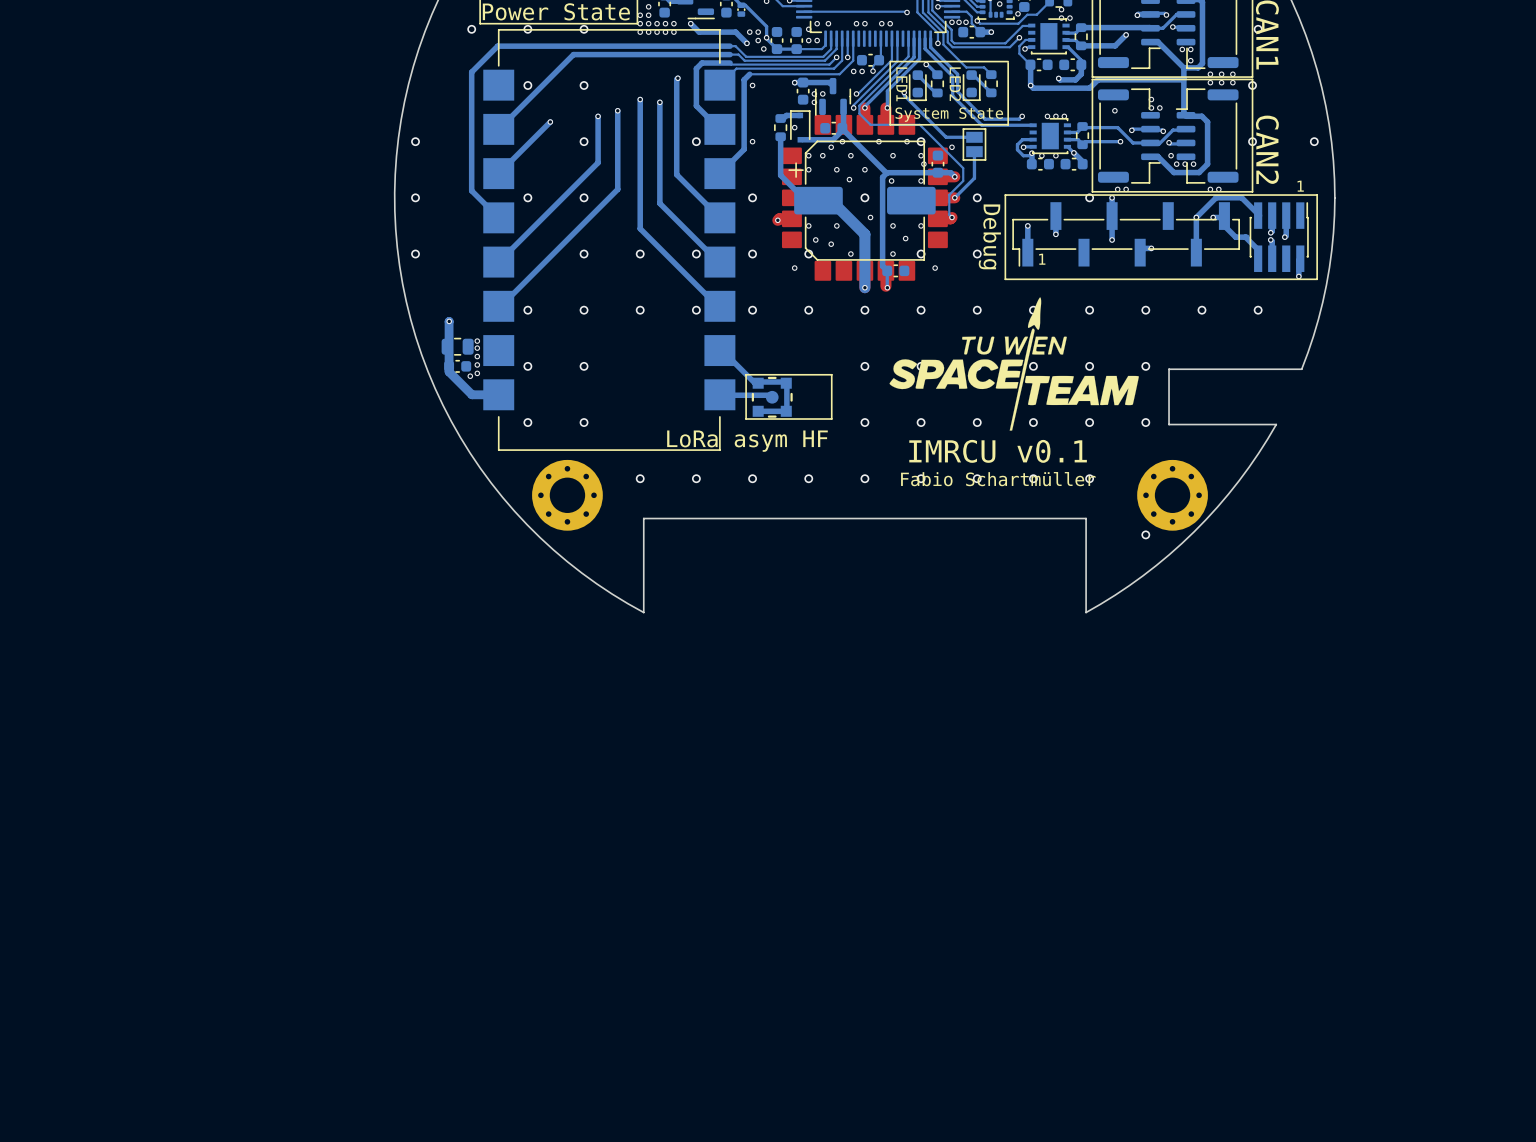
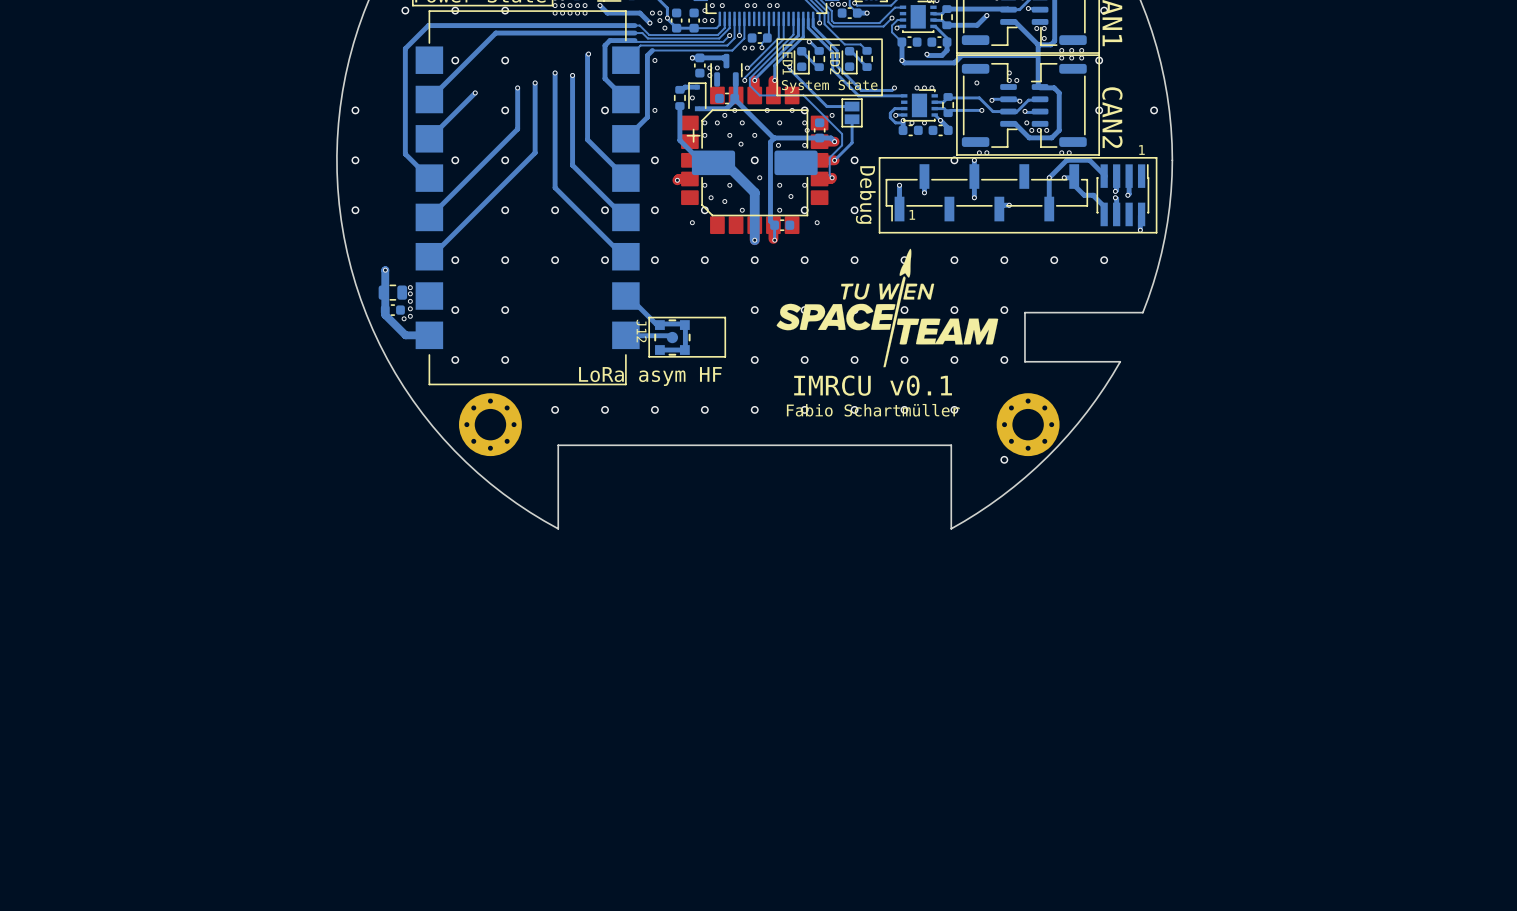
J12 name: none -> J12 (641, 331)

